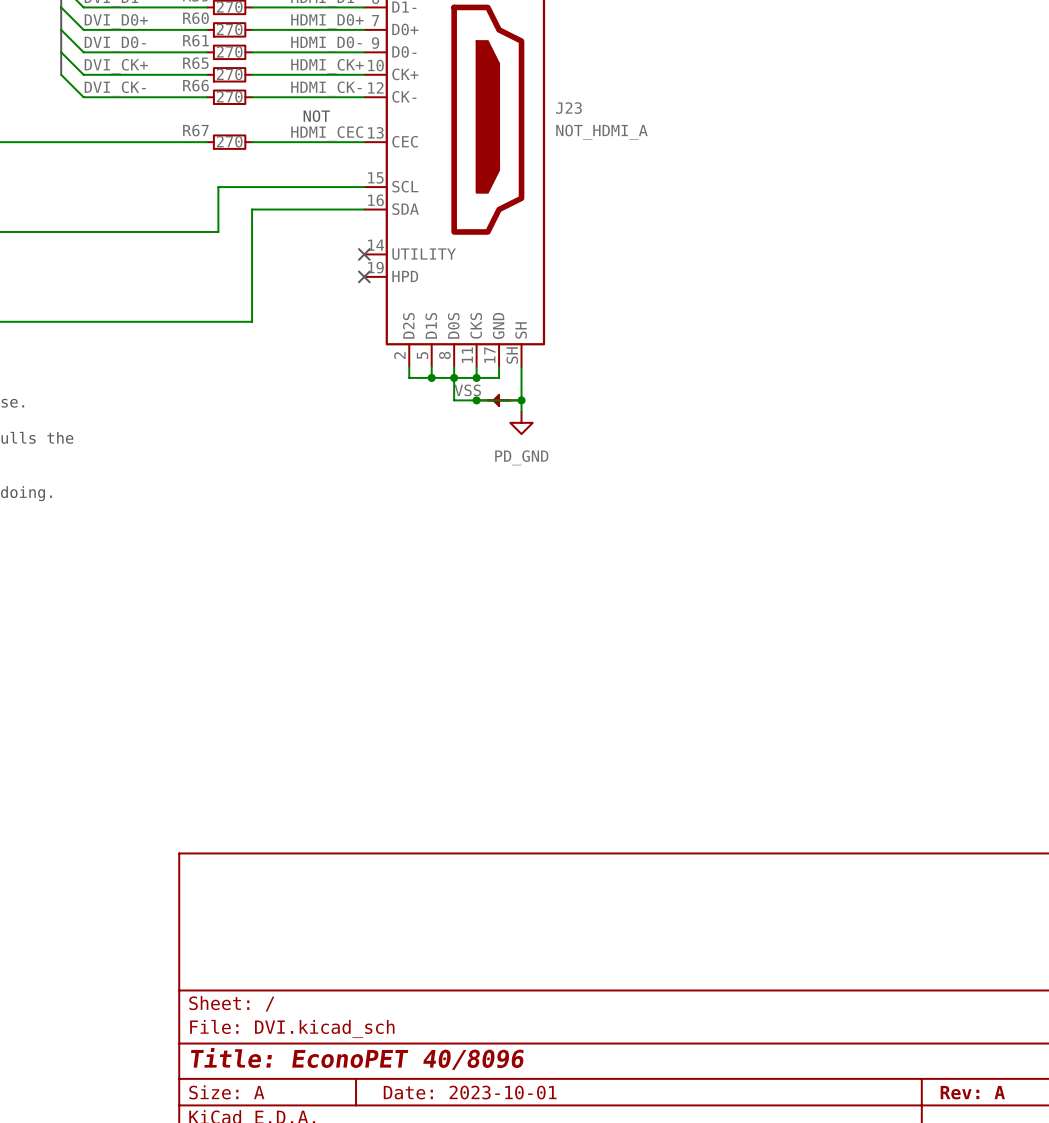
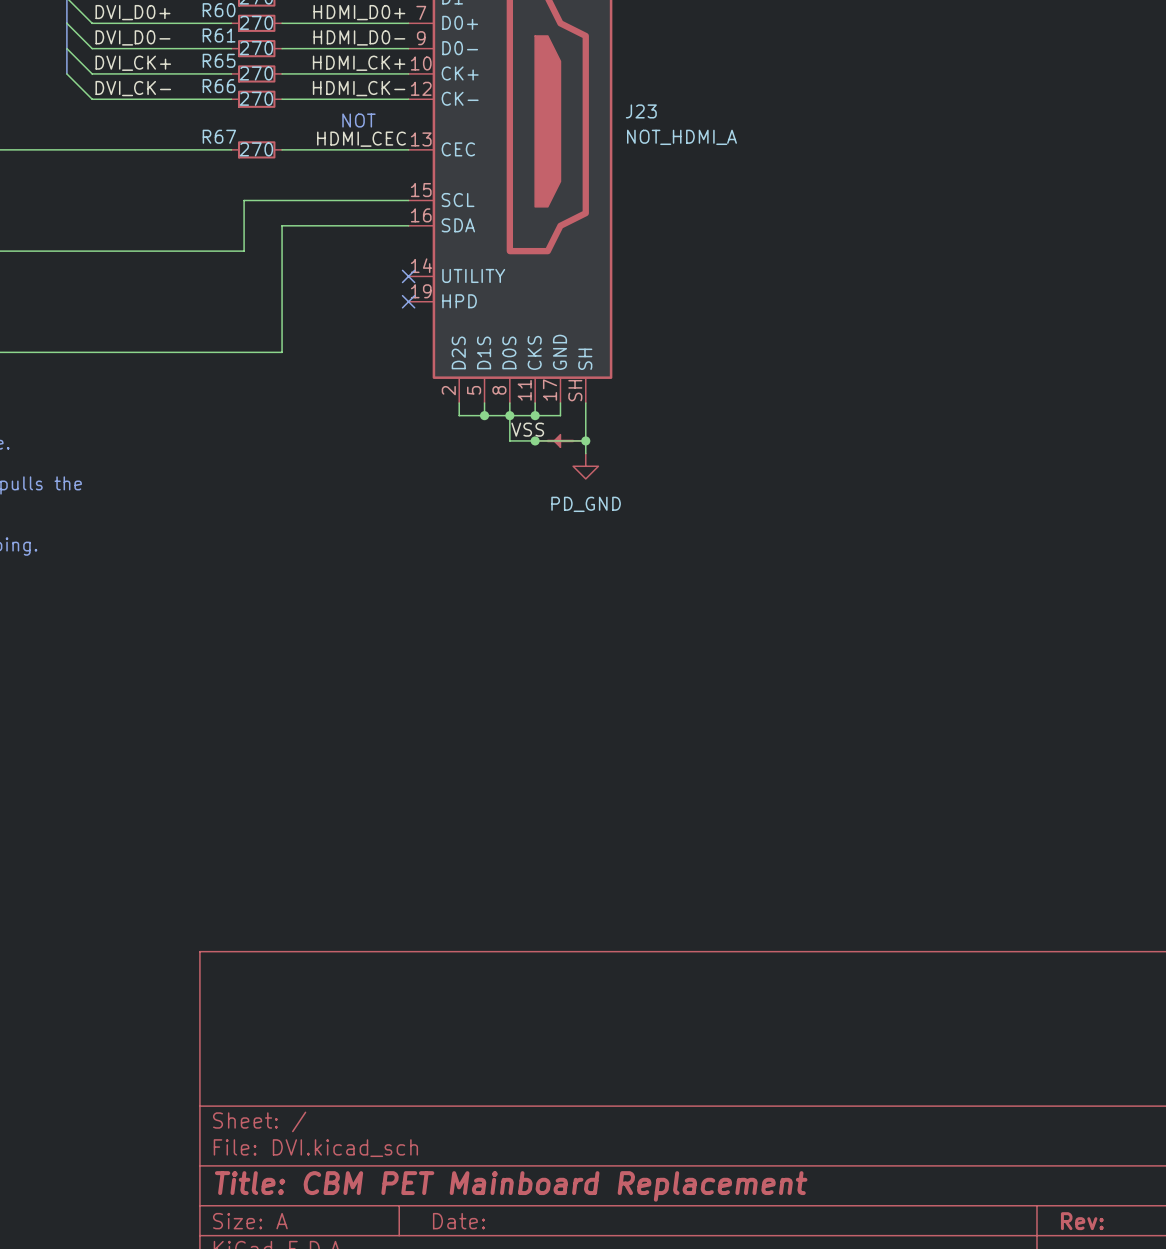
title block: Title: EconoPET 40/8096 (357, 1058) -> Title: CBM PET Mainboard Replacement (511, 1186)
title block: Date: 2023-10-01 (470, 1092) -> Date: (458, 1221)
title block: Rev: A (972, 1092) -> Rev: (1082, 1221)

